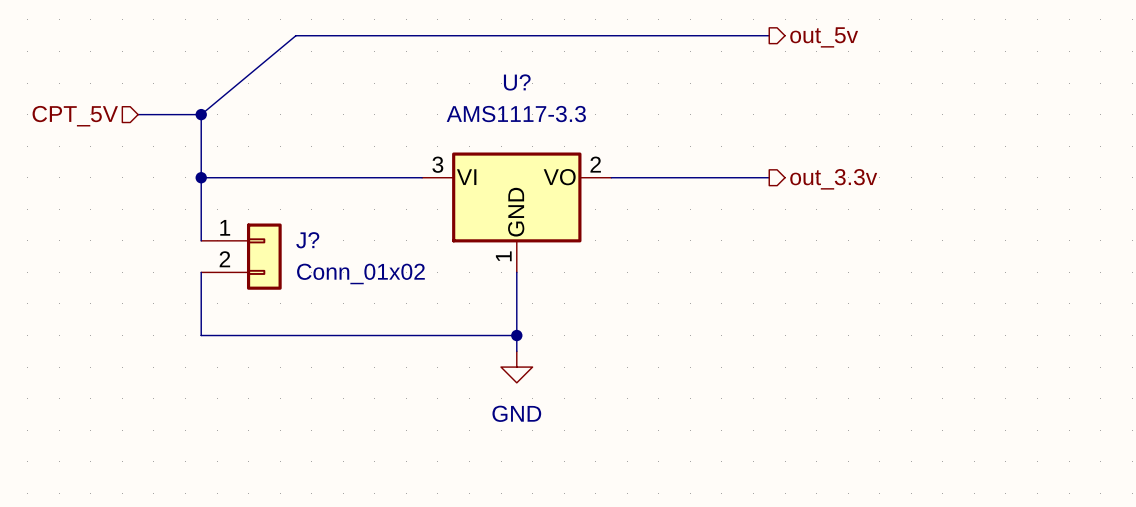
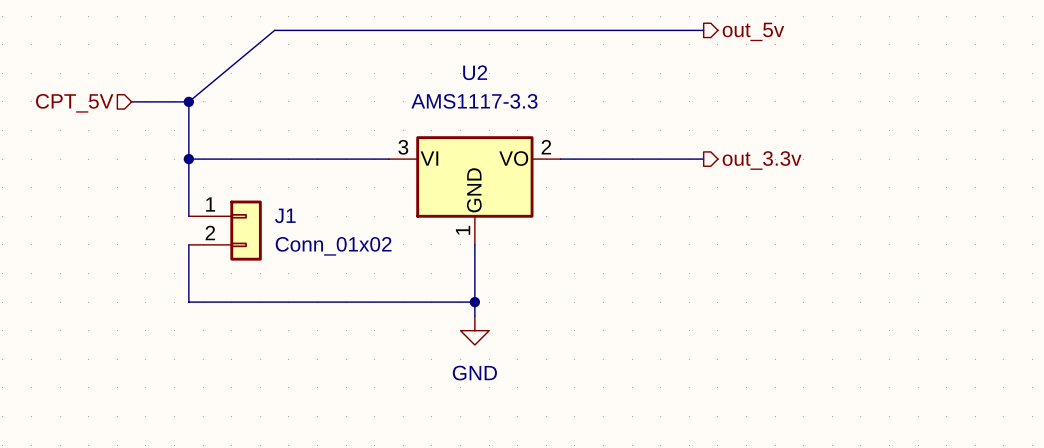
U? name: U? (517, 82) -> U2 (475, 72)
J? name: J? (307, 240) -> J1 (285, 215)

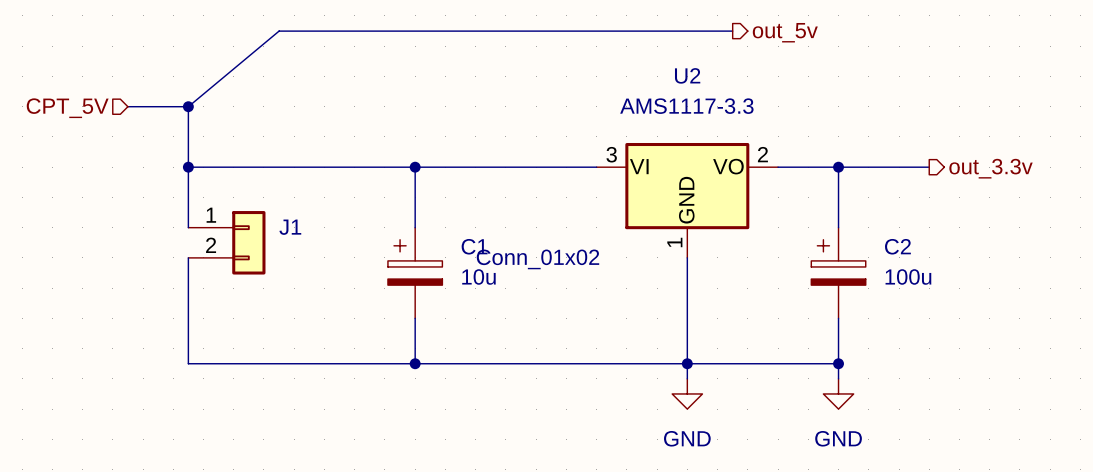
wire: none -> (415, 167) (415, 227)
junction: none -> (415, 167)
wire: none -> (778, 167) (929, 167)
wire: none -> (838, 167) (838, 227)
junction: none -> (838, 167)
hierarchical label position: out_3.3v (762, 160) -> out_3.3v (991, 168)
U2 position: (474, 190) -> (687, 200)
wire: (474, 244) (474, 316) -> none
wire: none -> (687, 257) (687, 378)
J1 value position: Conn_01x02 (333, 246) -> Conn_01x02 (537, 259)
C1: none -> 10u (415, 273)
C2: none -> 100u (838, 273)
wire: (188, 302) (474, 302) -> (188, 318) (188, 363) (838, 363)
wire: none -> (415, 318) (415, 363)
junction: (474, 302) -> none
wire: none -> (838, 318) (838, 378)
power symbol: GND (474, 330) -> none
junction: none -> (415, 363)
junction: none -> (687, 363)
junction: none -> (838, 363)
power symbol: none -> GND (687, 393)
power symbol: none -> GND (838, 393)

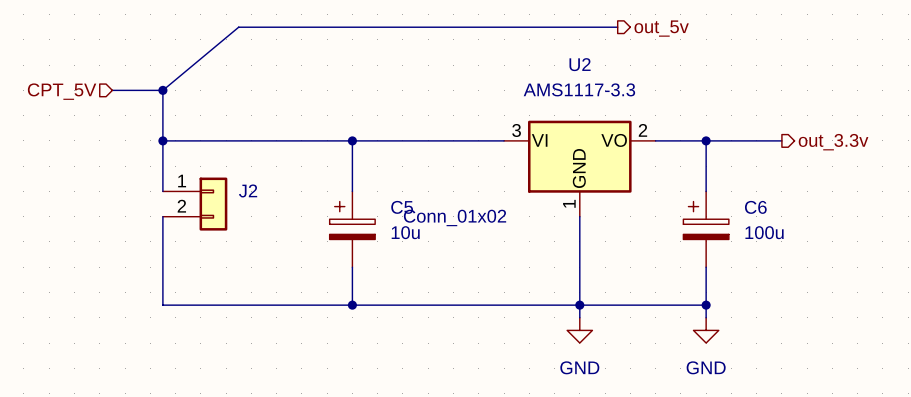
J1 name: J1 (290, 227) -> J2 (248, 190)
C1 name: C1 (474, 246) -> C5 (402, 207)
C2 name: C2 (897, 246) -> C6 (755, 207)

